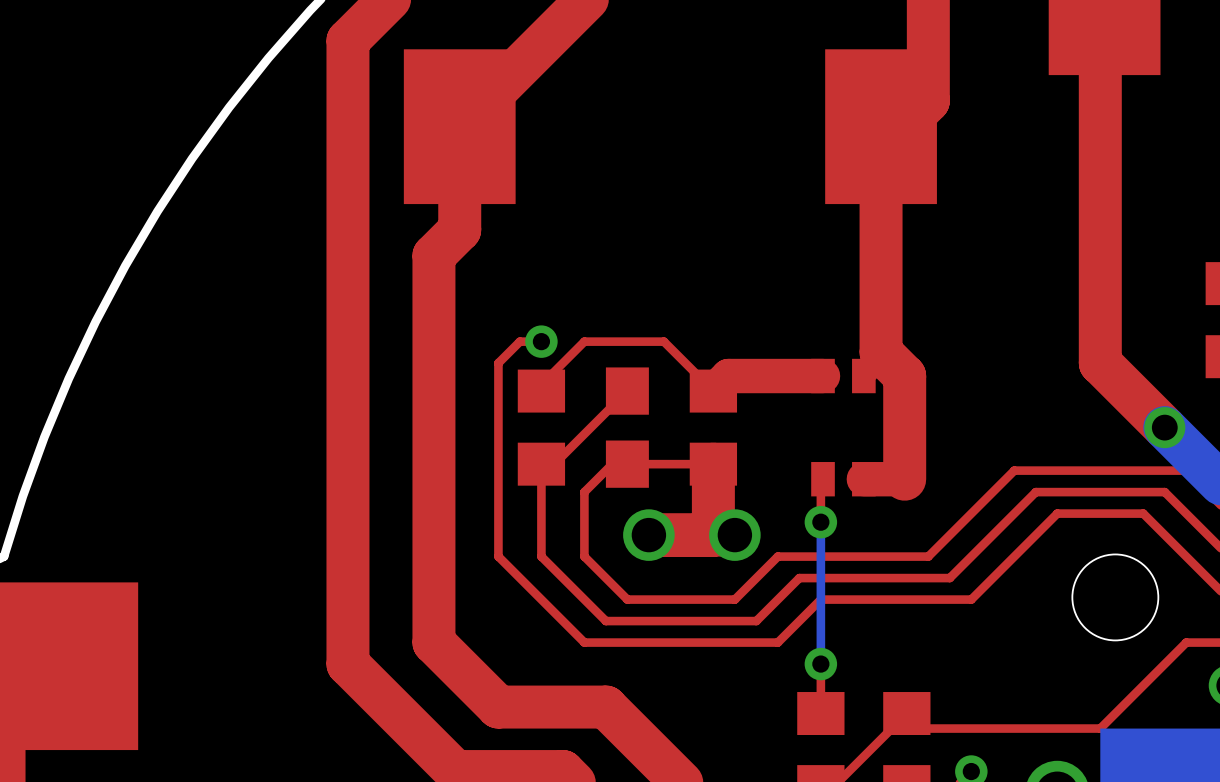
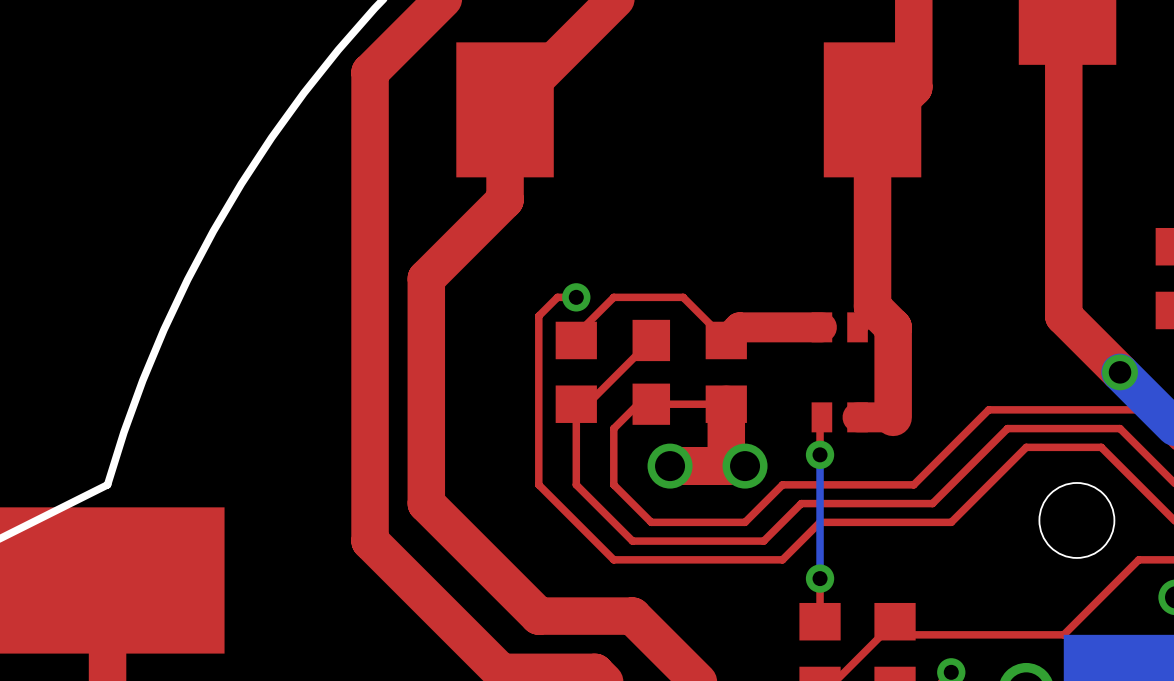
top track: (347, 40) (347, 664) -> (407, 34) (370, 72) (370, 541) (407, 578)
top track: (433, 255) (433, 642) -> (482, 222) (426, 278) (426, 503) (482, 559)

